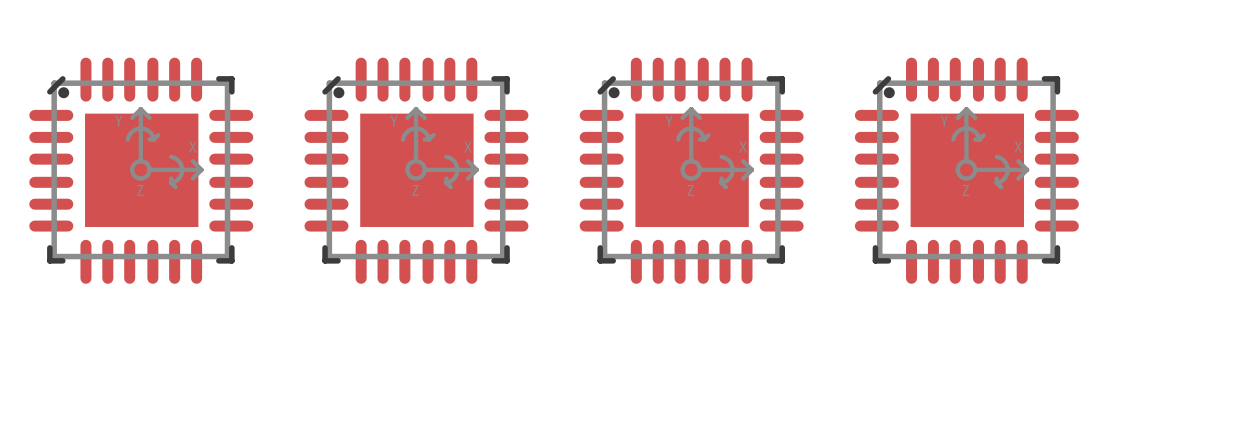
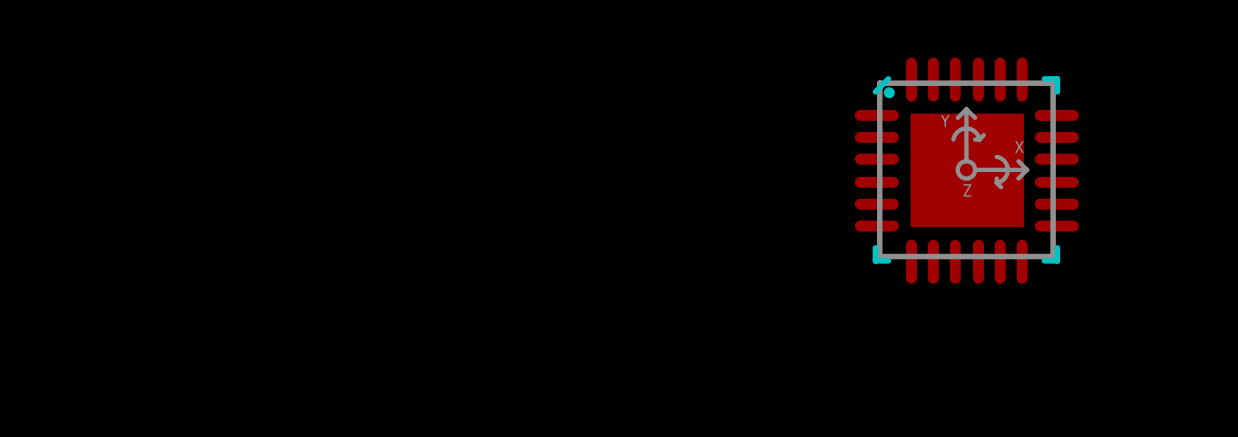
part: (141, 170) -> none
part: (416, 170) -> none
part: (691, 170) -> none

